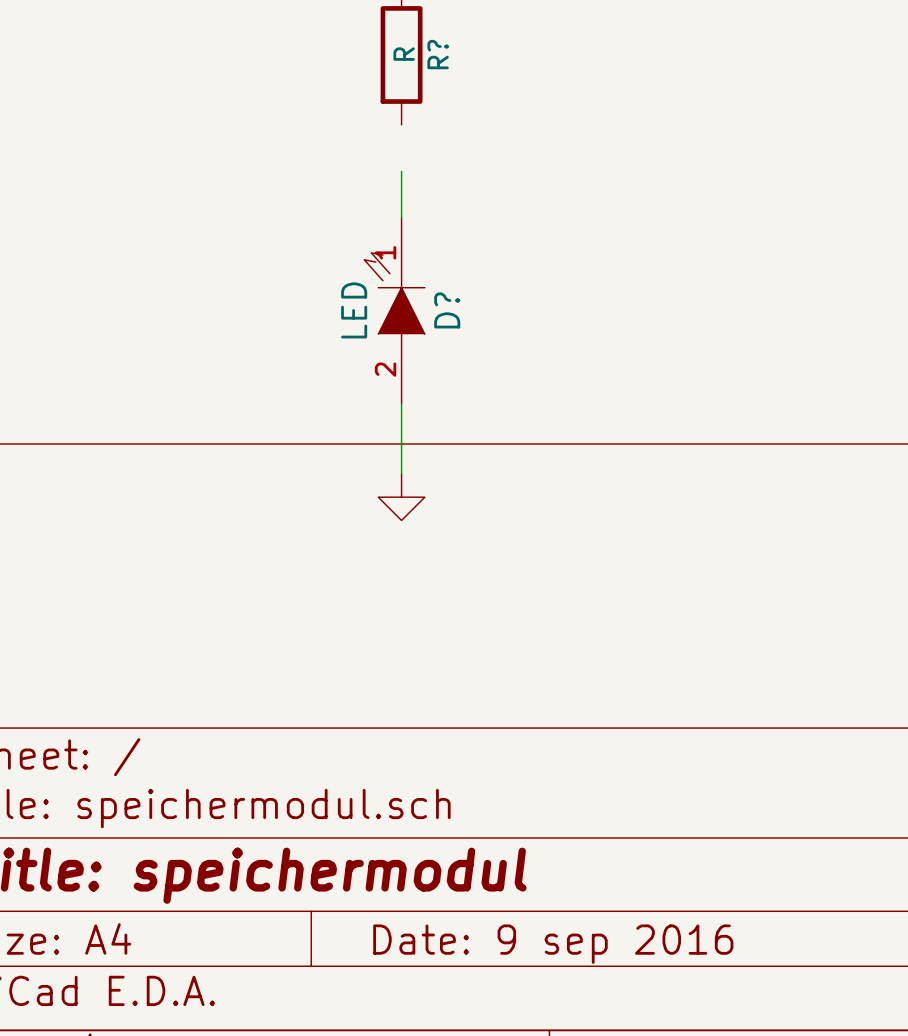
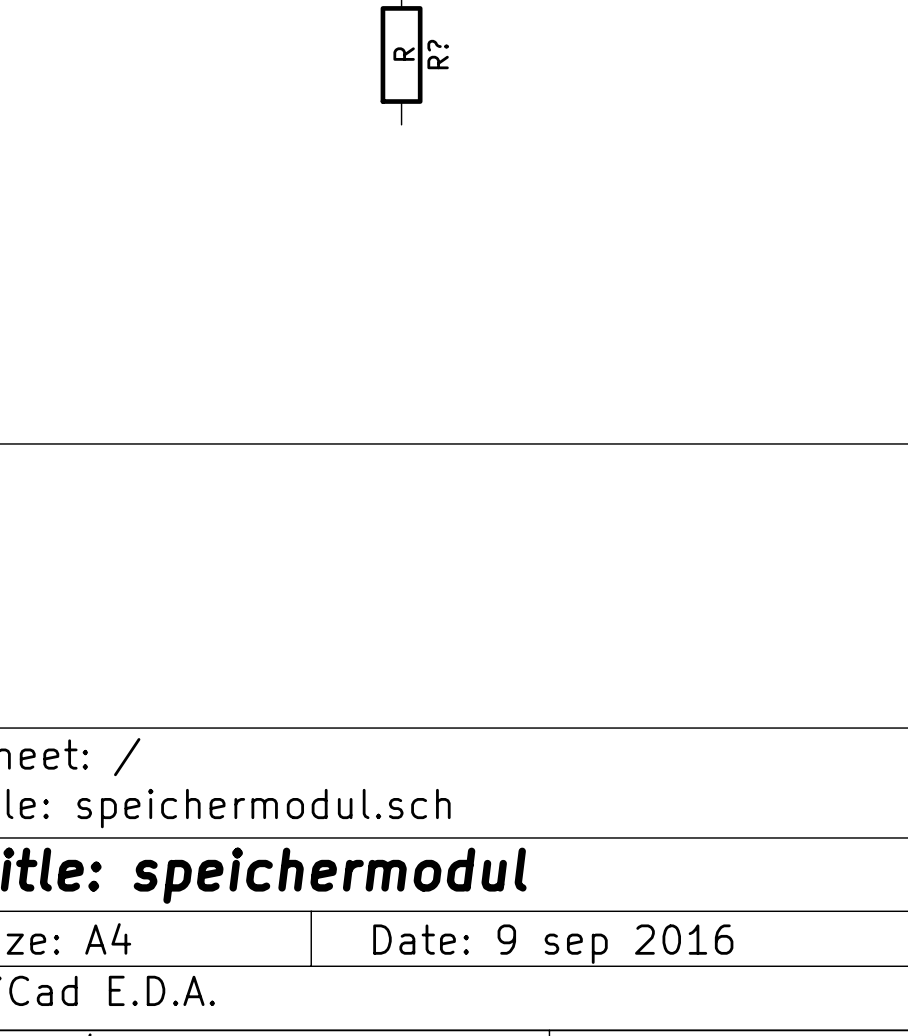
wire: (401, 171) (401, 217) -> none
D?: LED (394, 310) -> none
wire: (401, 404) (401, 473) -> none
power symbol: (401, 497) -> none

